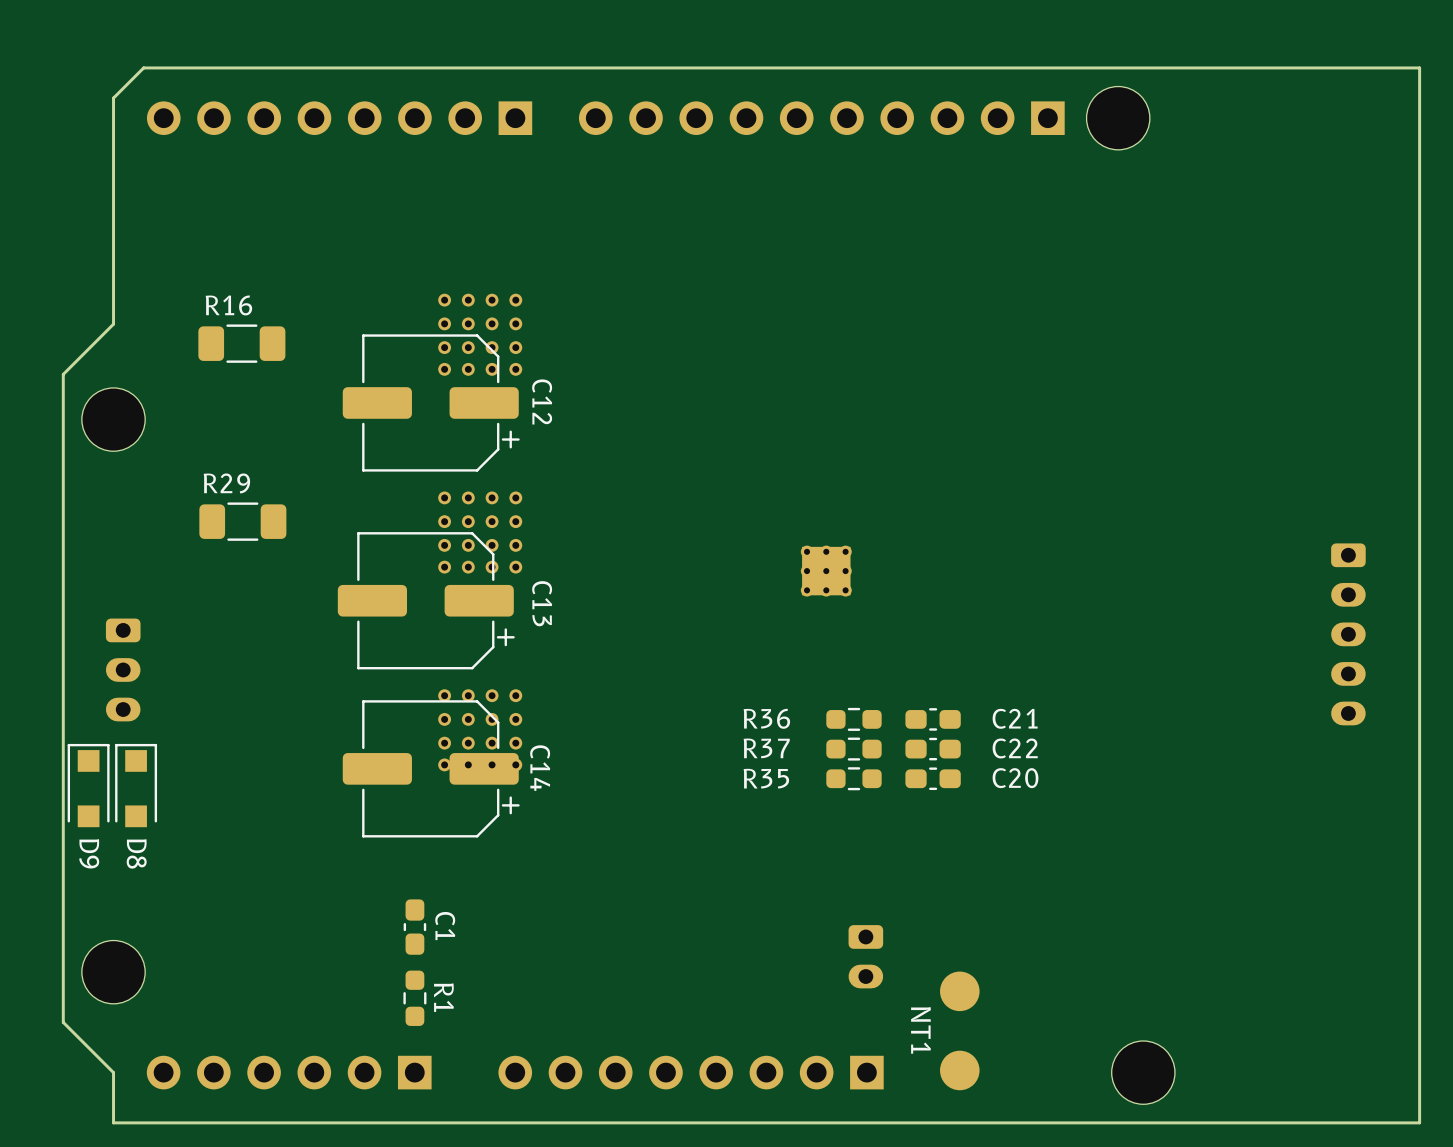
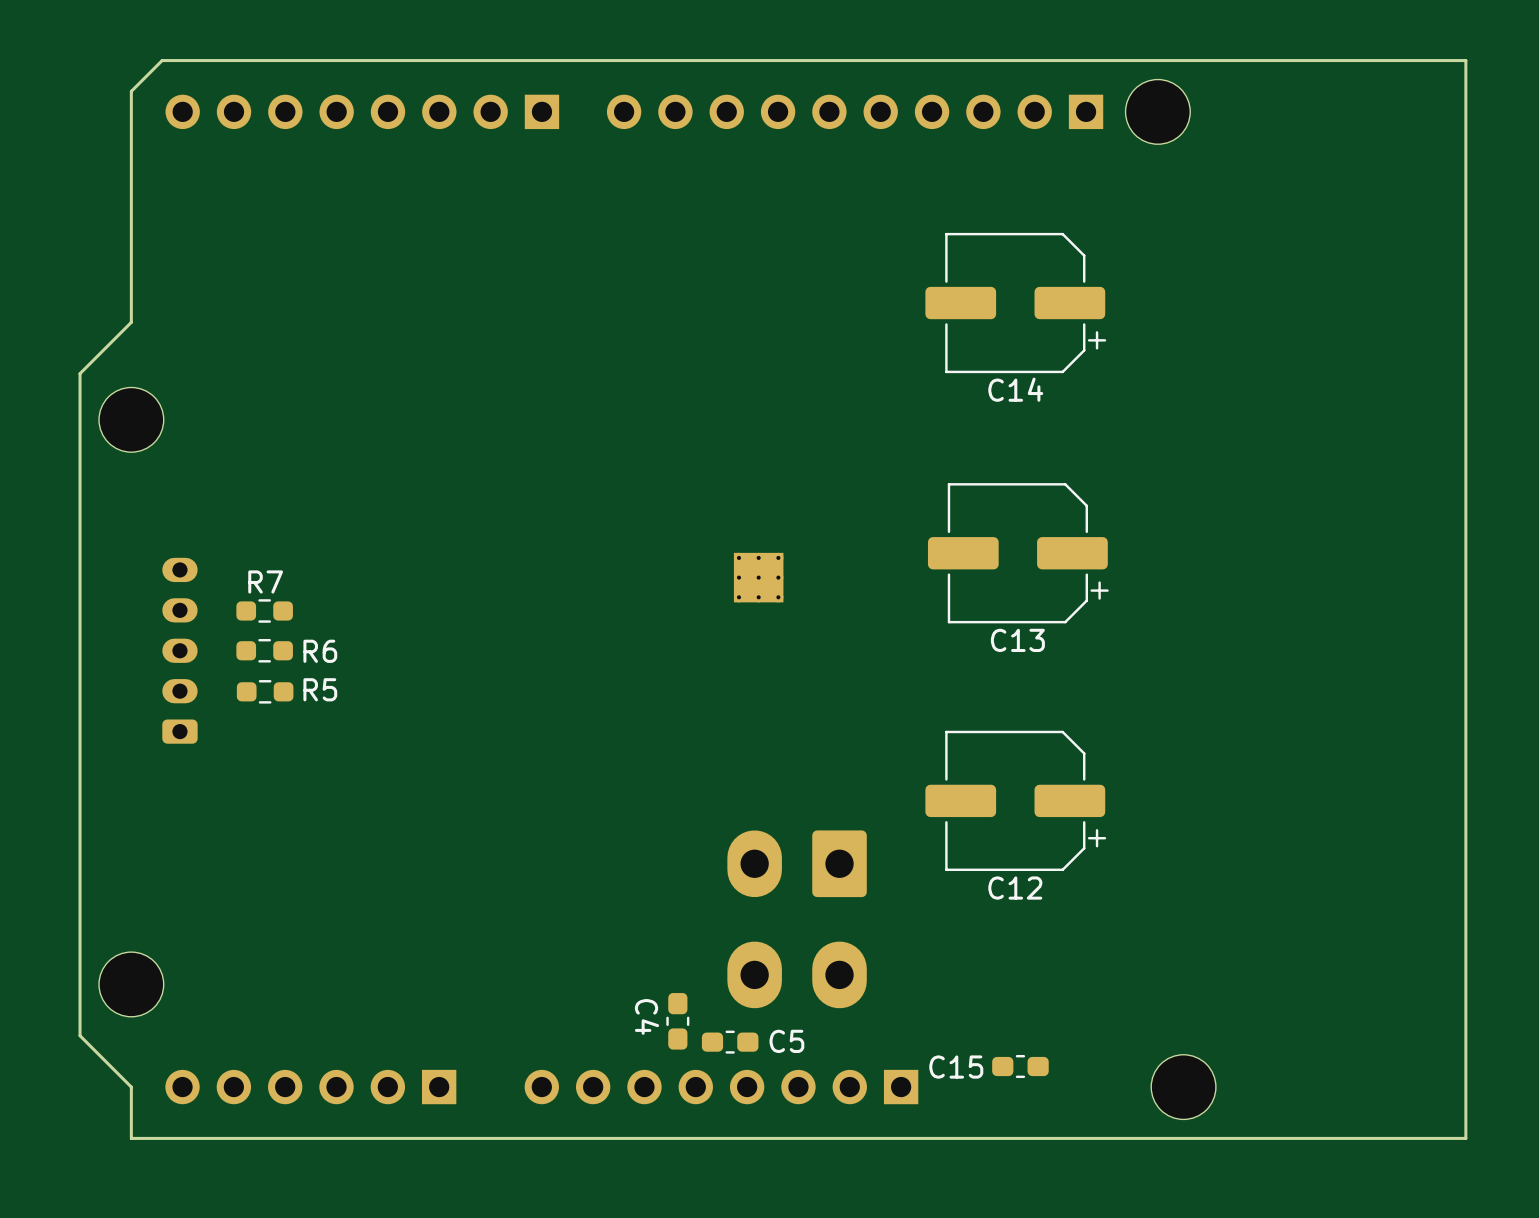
C12 footprint: [342, 334, 520, 472] -> [925, 730, 1107, 872]
part: (480, 334) -> none
R16: (241, 343) -> none
C12 name position: C12 (542, 401) -> C12 (1015, 888)
R29: (242, 521) -> none
part: (480, 532) -> none
part: (826, 571) -> none
part: none -> (758, 577)
C13 position: (426, 600) -> (1018, 553)
C13 name rotation: 0° (542, 603) -> 90° counterclockwise (1017, 640)
C13 name position: C13 (542, 603) -> C13 (1017, 640)
R7: none -> (264, 610)
part: (1348, 634) -> none
part: none -> (179, 650)
R6: none -> (264, 650)
part: (123, 669) -> none
R5: none -> (265, 691)
C14 footprint: [342, 700, 520, 838] -> [925, 232, 1107, 374]
R36: (853, 719) -> none
C21: (933, 719) -> none
part: (480, 730) -> none
R37: (853, 749) -> none
C22: (933, 749) -> none
C14 name position: C14 (540, 768) -> C14 (1015, 389)
R35: (853, 778) -> none
C20: (933, 778) -> none
D9: (88, 785) -> none
D8: (136, 785) -> none
part: none -> (797, 919)
C1: (414, 927) -> none
part: (865, 956) -> none
R1: (414, 998) -> none
C4: none -> (677, 1021)
C5: none -> (730, 1042)
NT1: (959, 1030) -> none
C15: none -> (1020, 1066)

